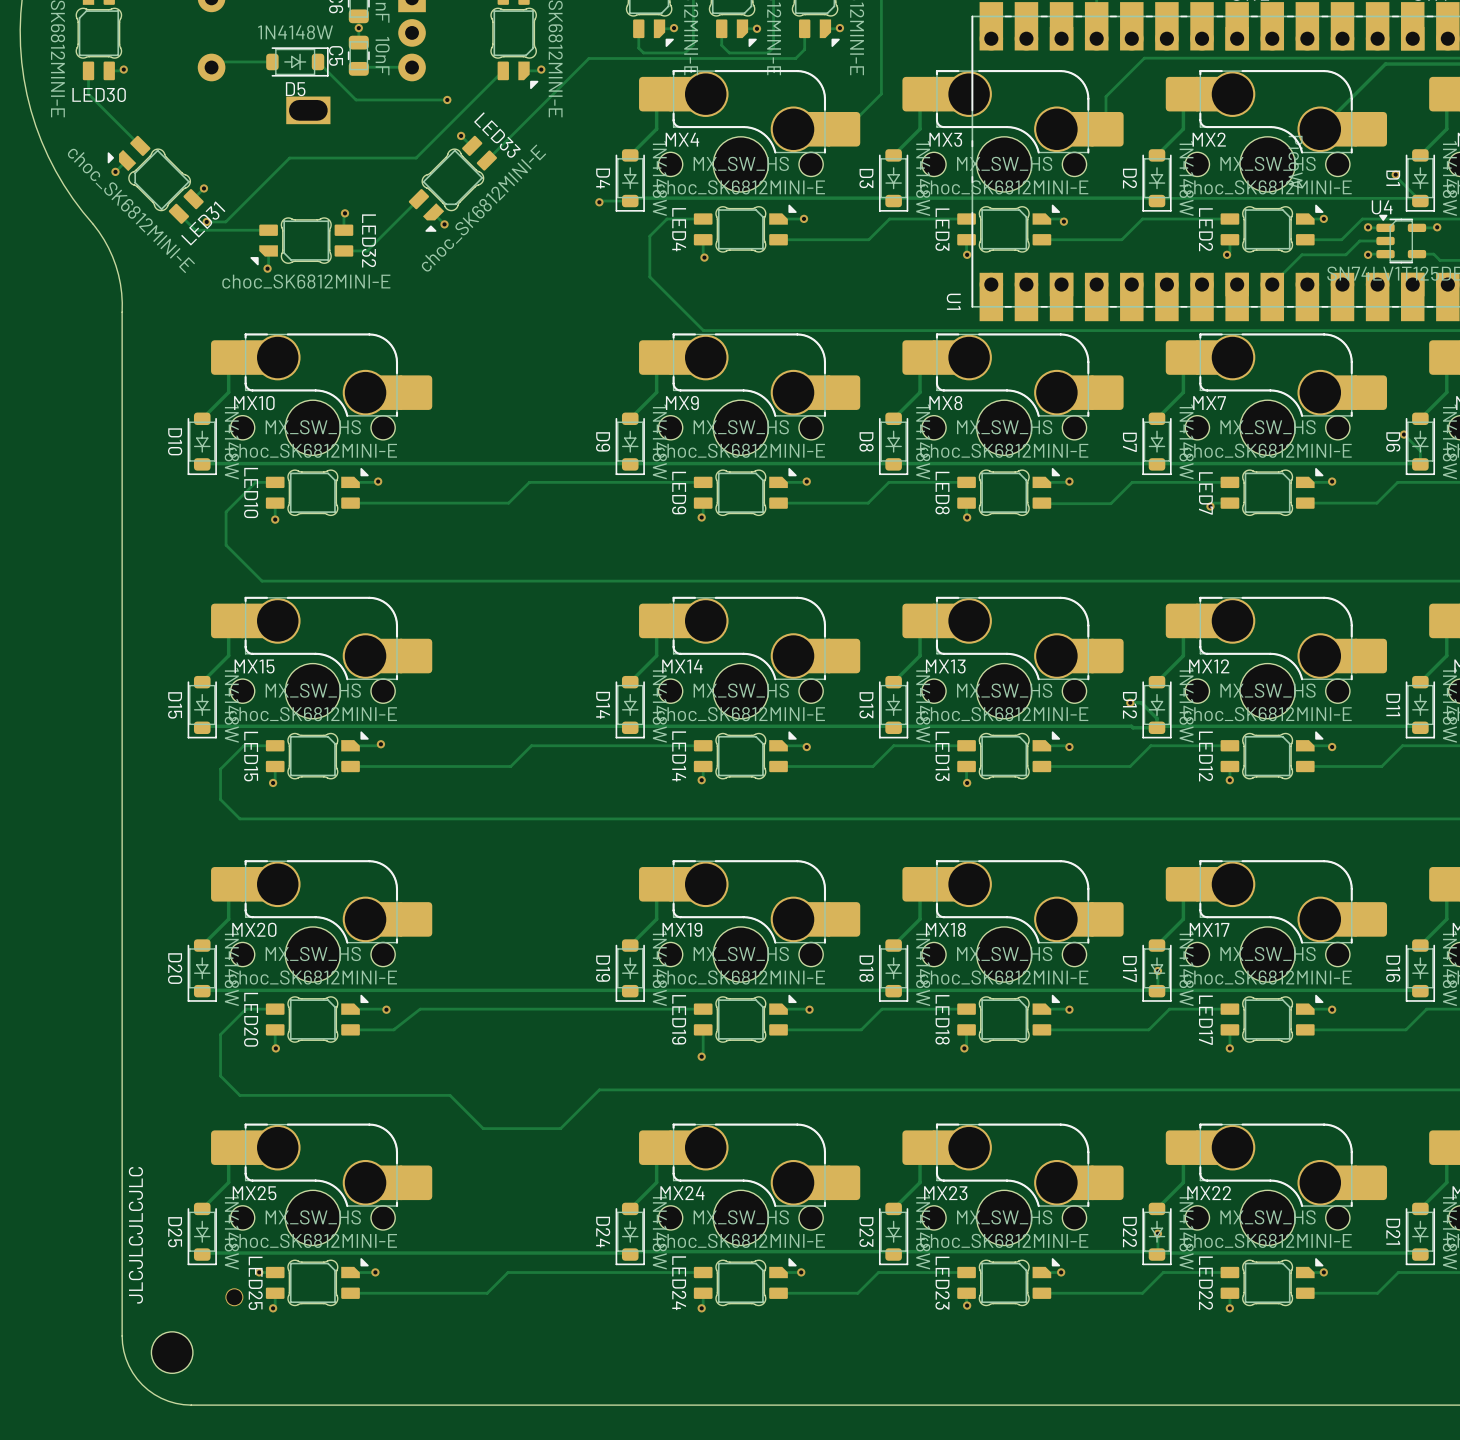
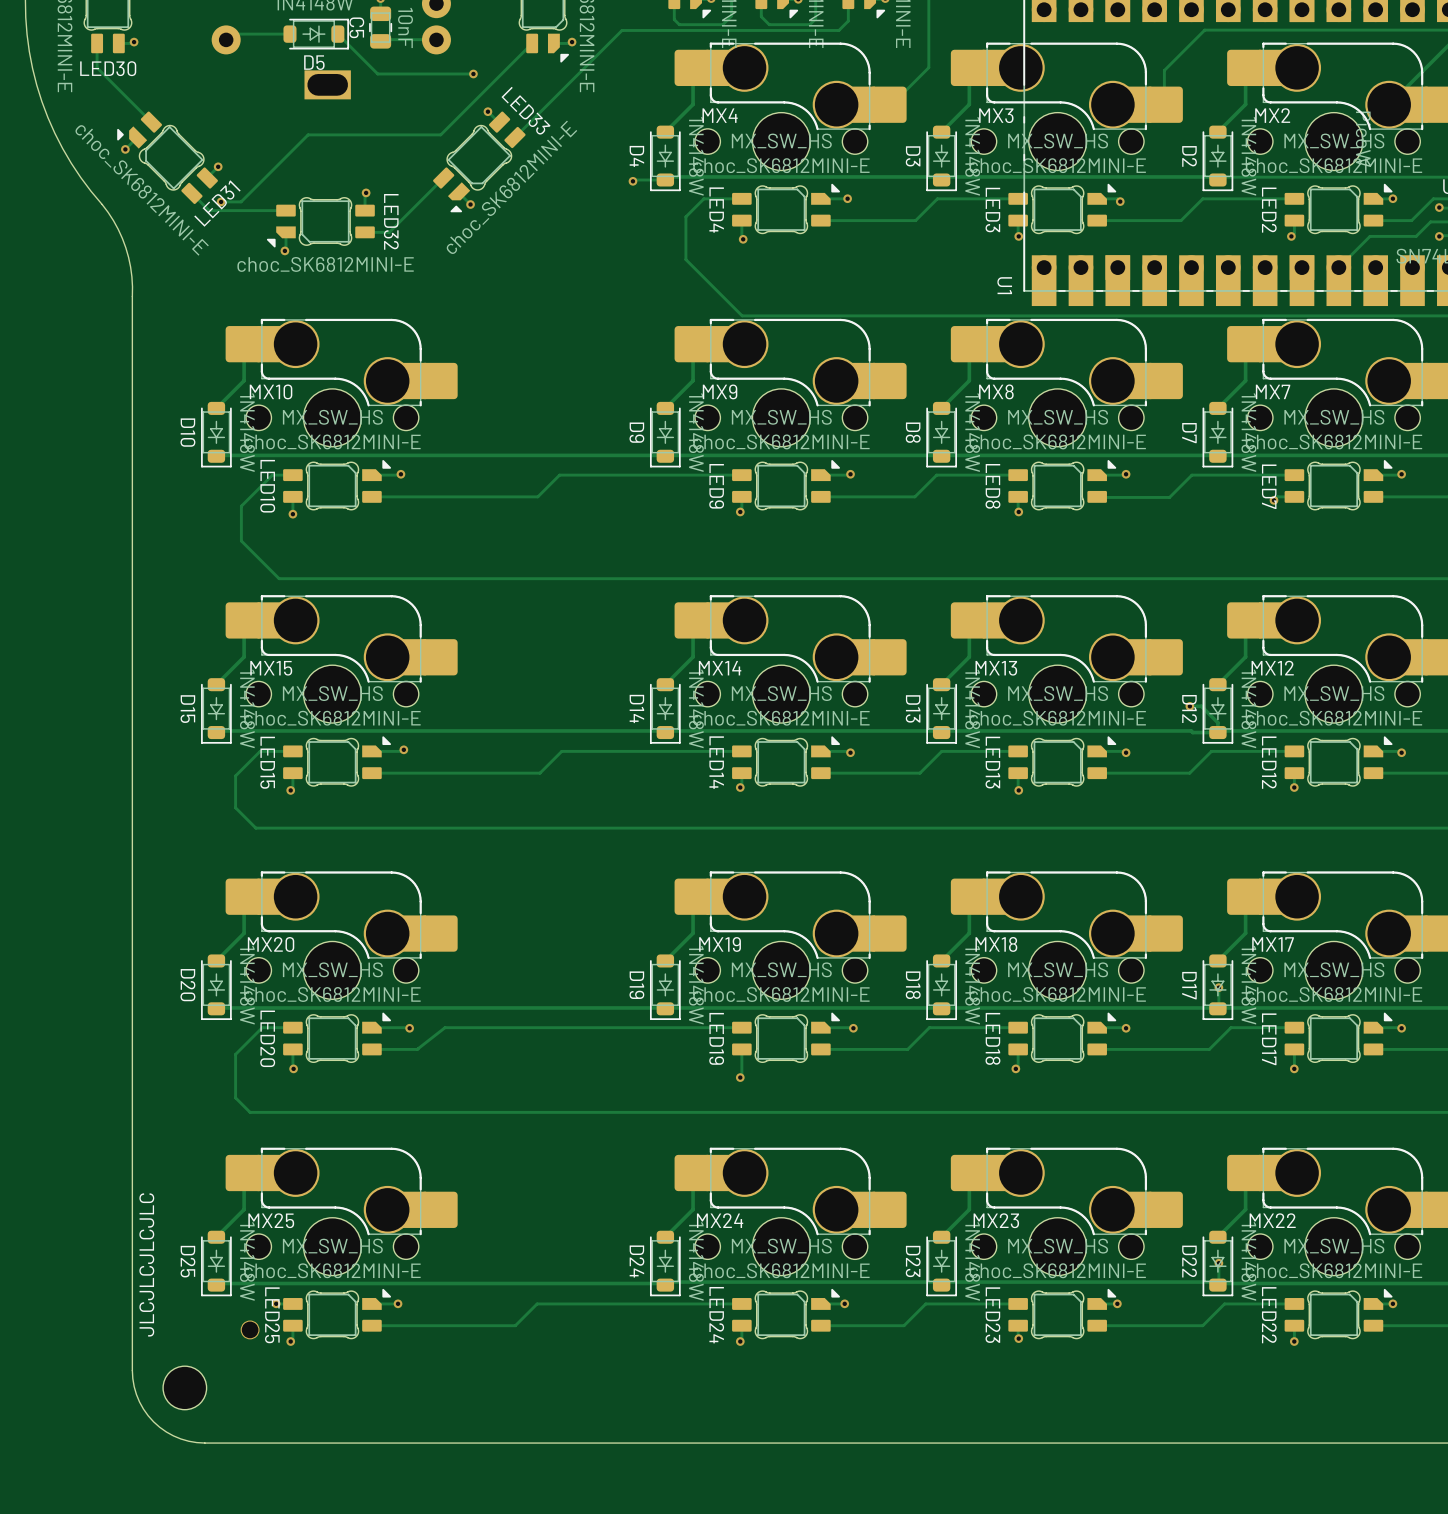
track: (599, 1089) (560, 1128) (483, 1128) (450, 1095) (239, 1095) (234, 1089) -> (632, 1112) (250, 1112)

